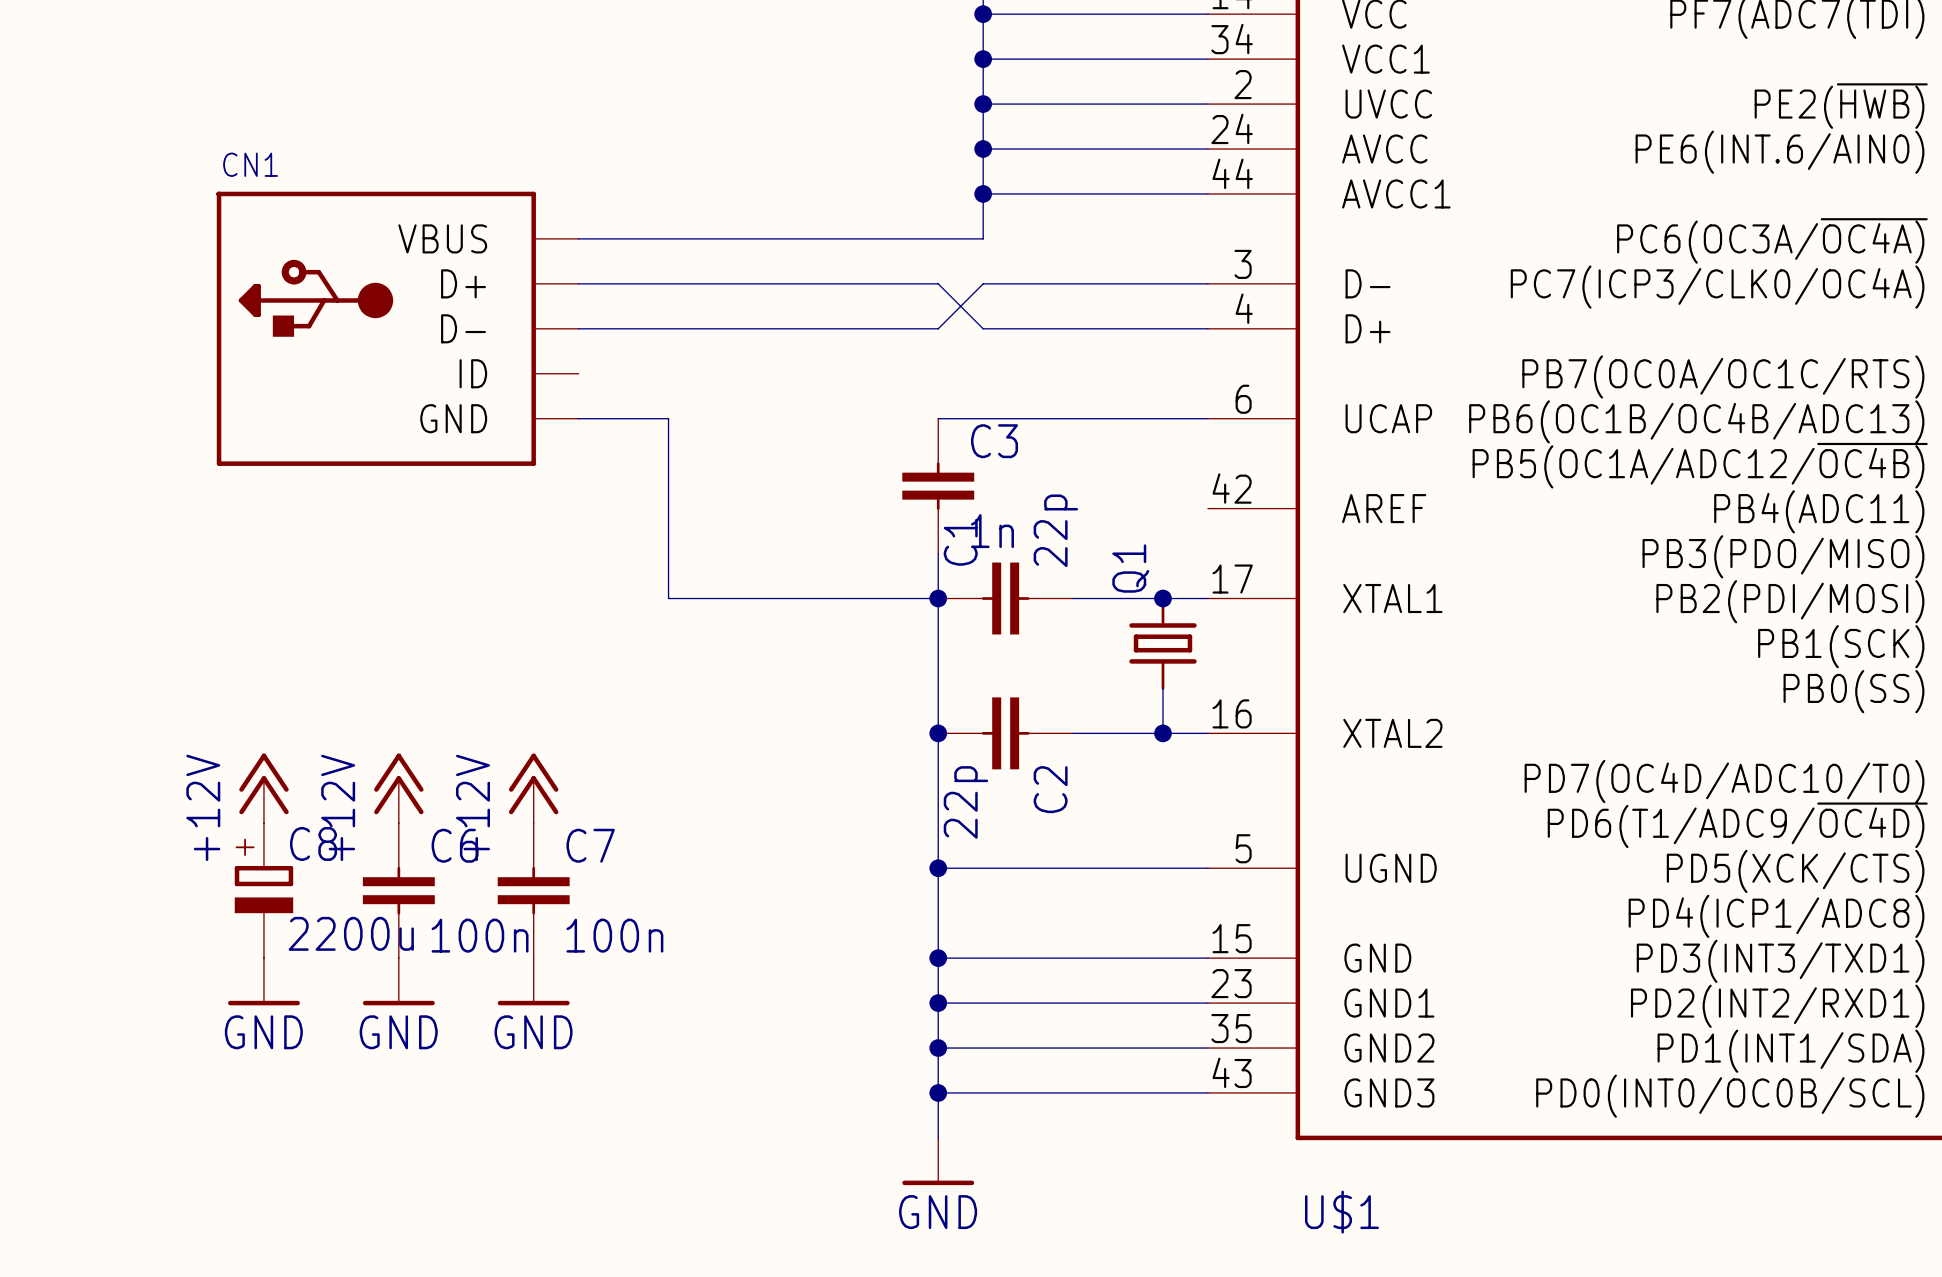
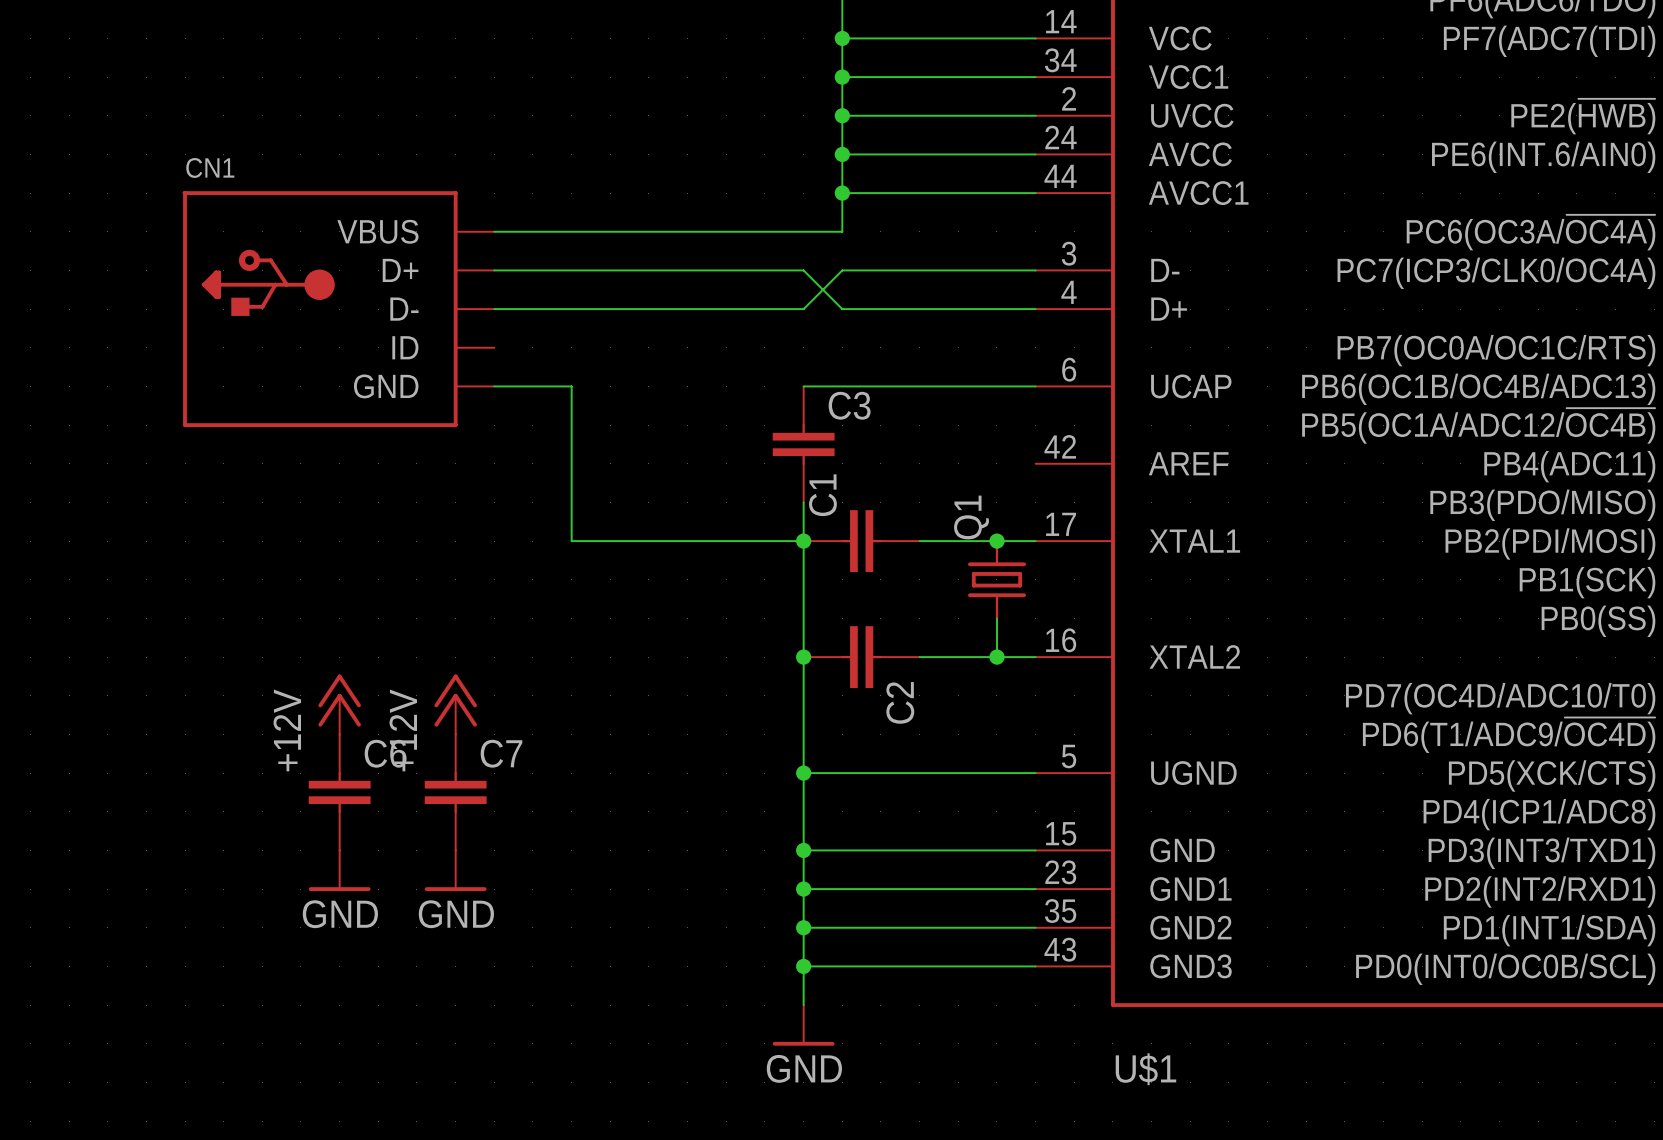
C1 value: 22p (1055, 530) -> none
C3 value: 1n (992, 531) -> none
power symbol: +12V (263, 788) -> none
C2 value: 22p (965, 802) -> none
C8: 2200u (263, 890) -> none
C6 value: 100n (480, 935) -> none
C7 value: 100n (614, 935) -> none
power symbol: GND (263, 981) -> none

